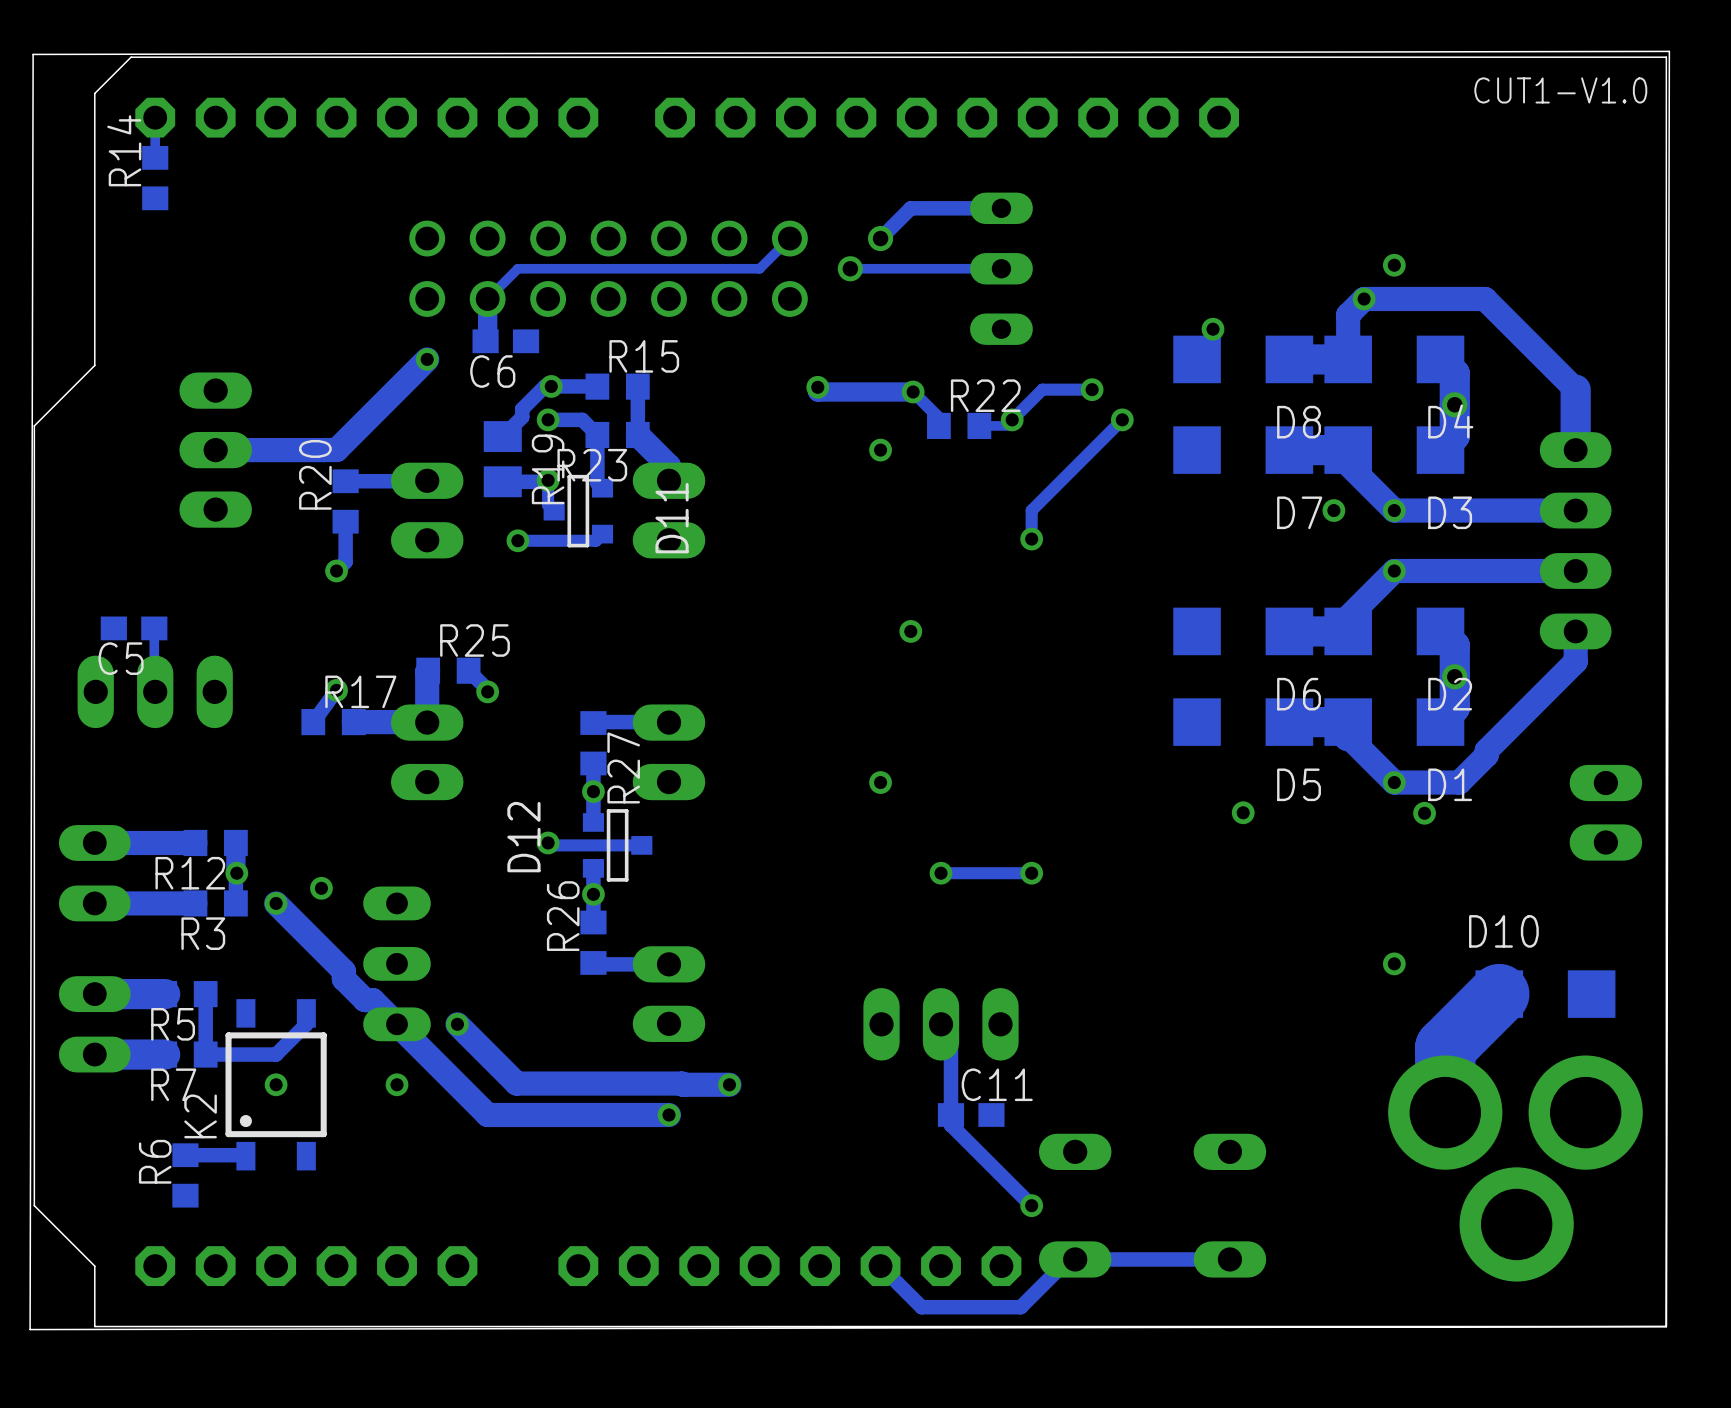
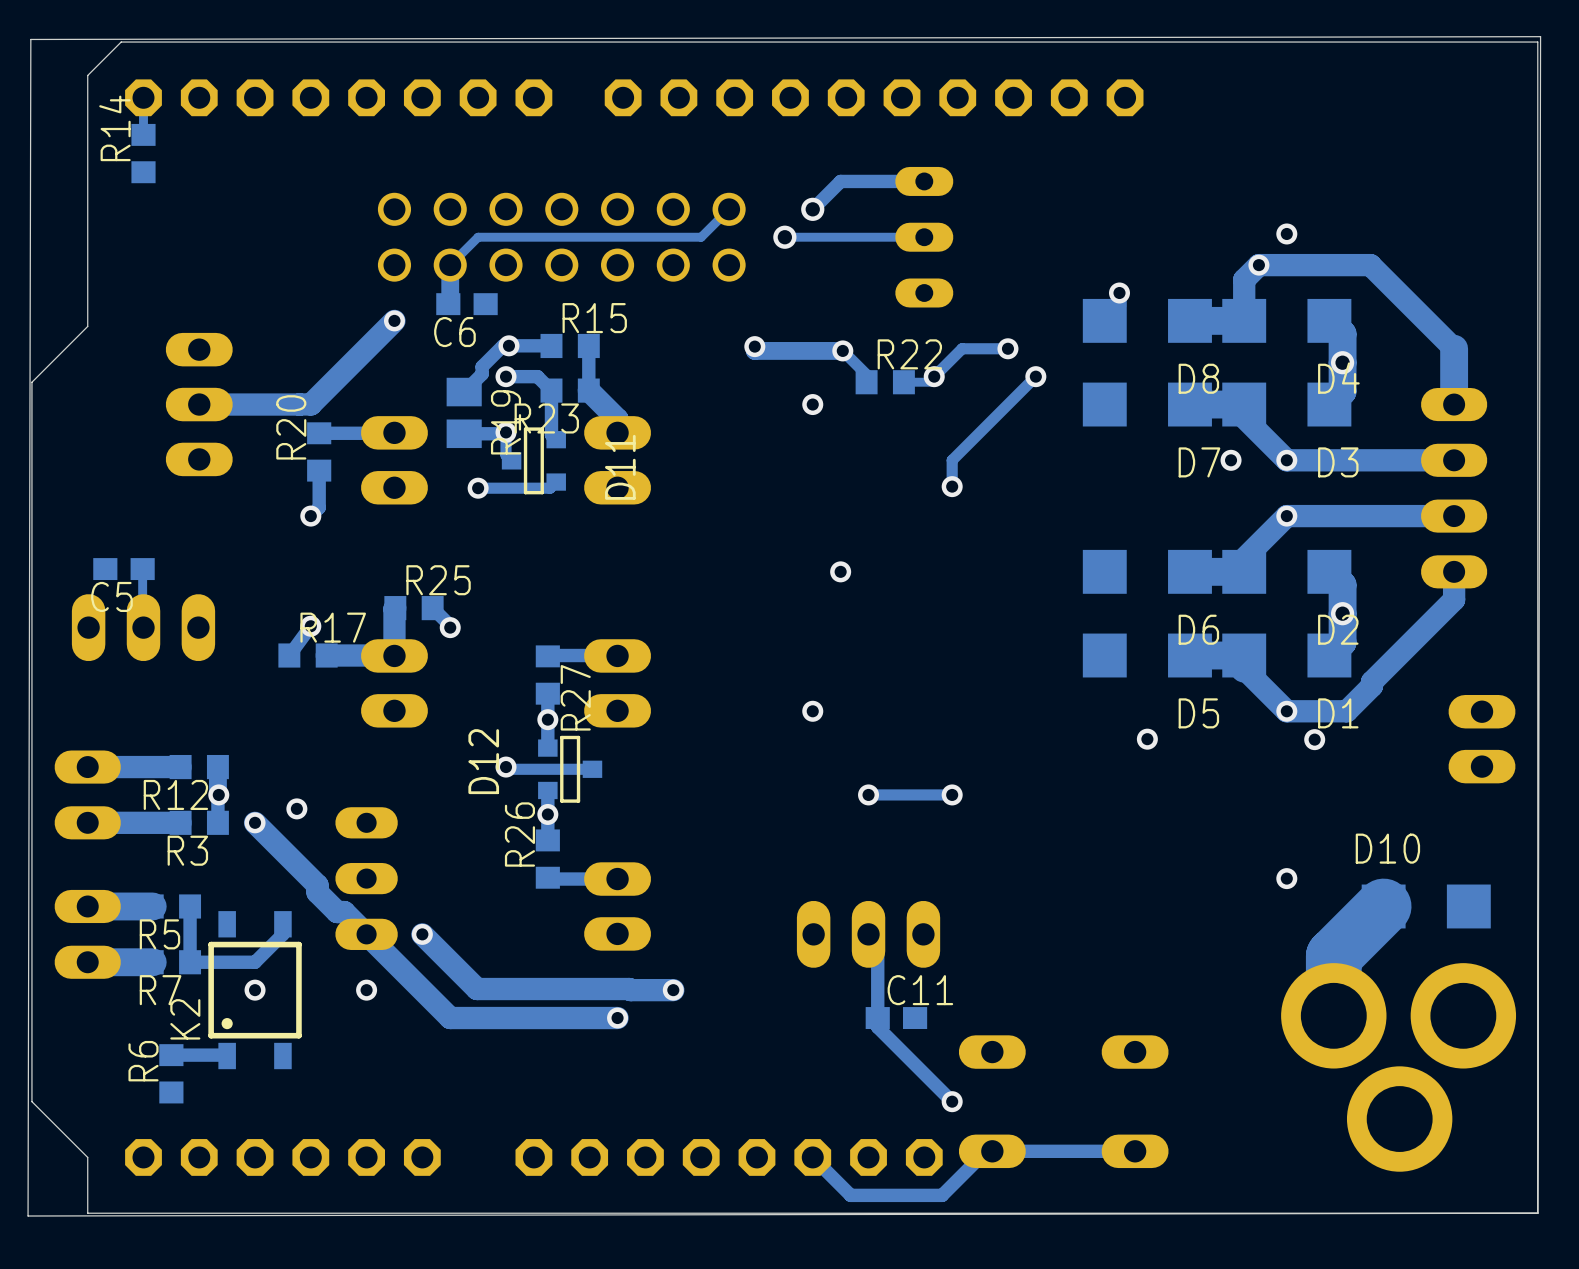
text: CUT1-V1.0 (1560, 90) -> none

